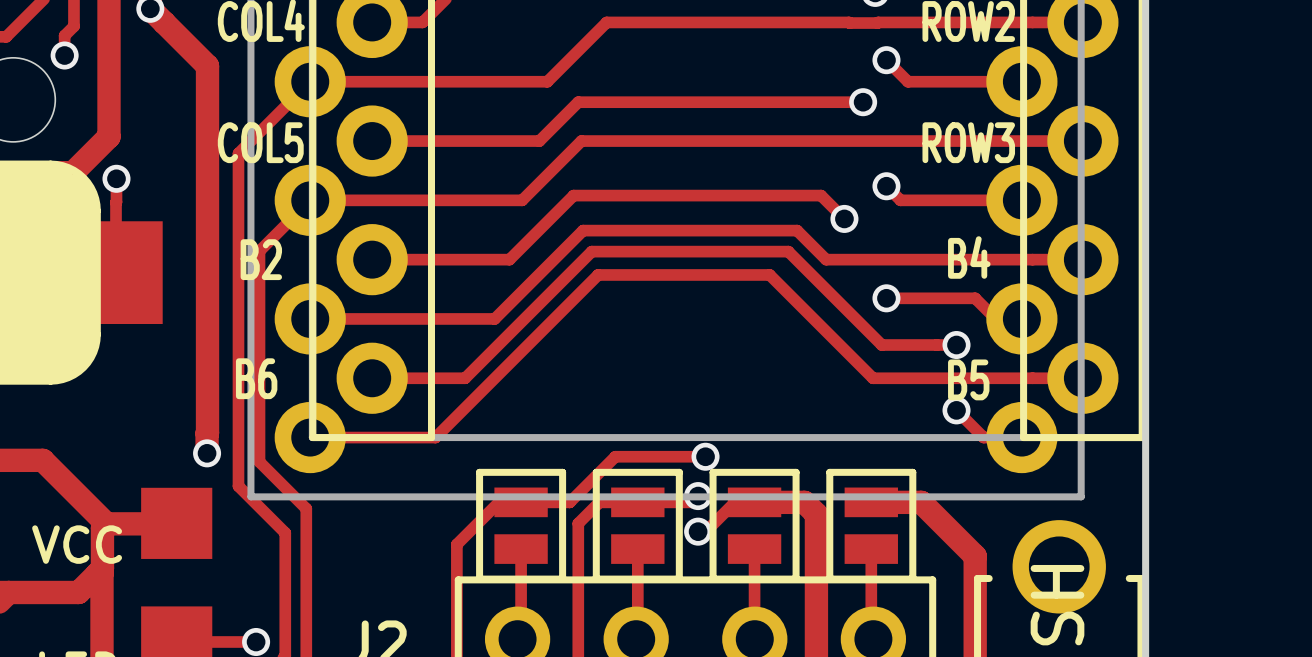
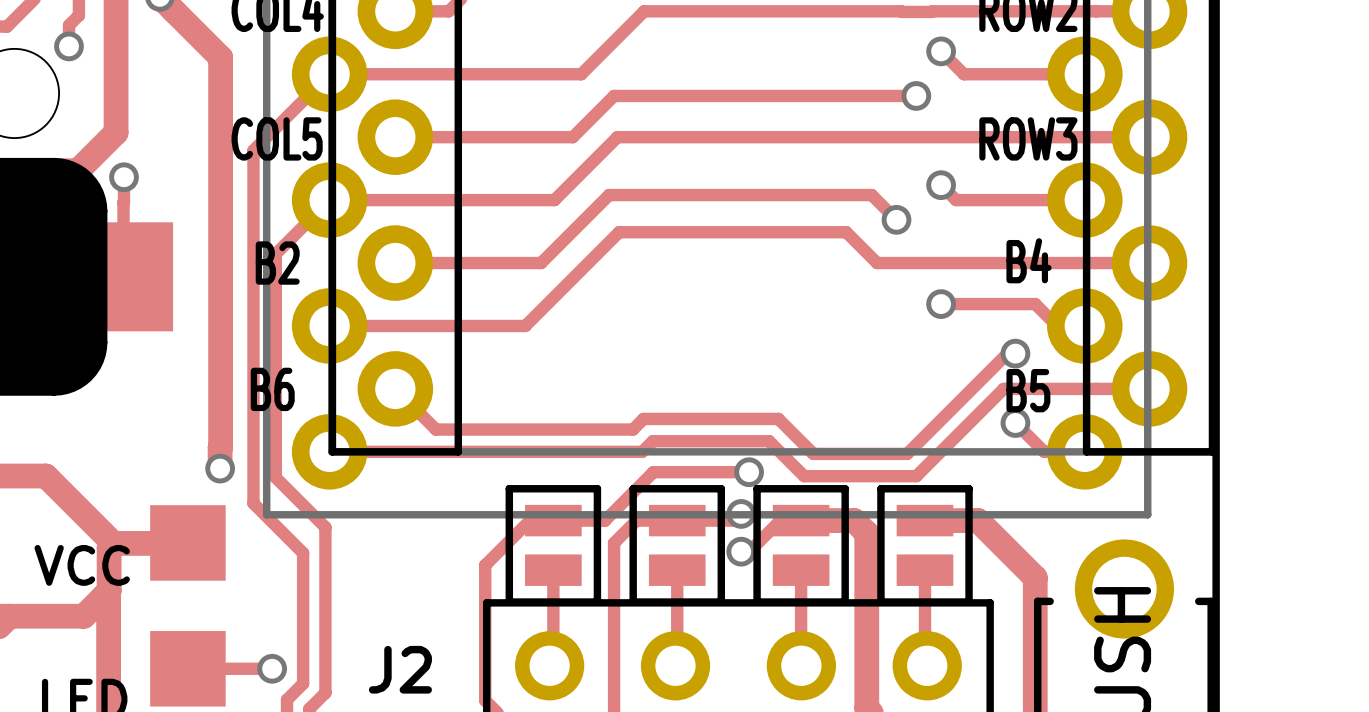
track: (948, 345) (881, 345) (788, 251) (591, 251) (465, 378) (372, 378) -> (1007, 353) (907, 453) (813, 453) (778, 418) (643, 418) (632, 429) (435, 429) (395, 388)
track: (945, 378) (873, 378) (769, 274) (598, 274) (435, 437) -> (1003, 388) (916, 476) (804, 476) (769, 441) (652, 441) (642, 451) (462, 451)

